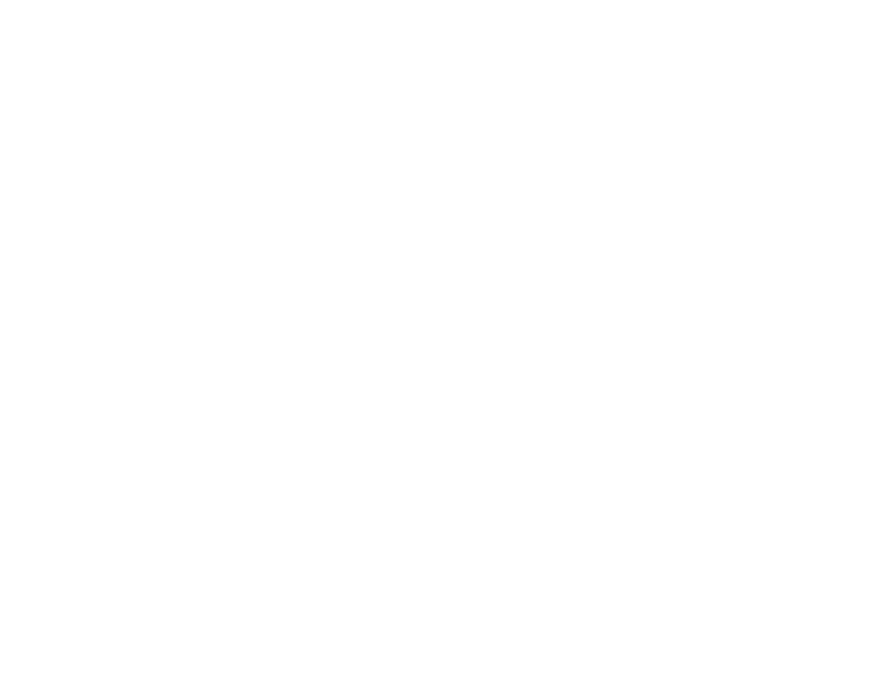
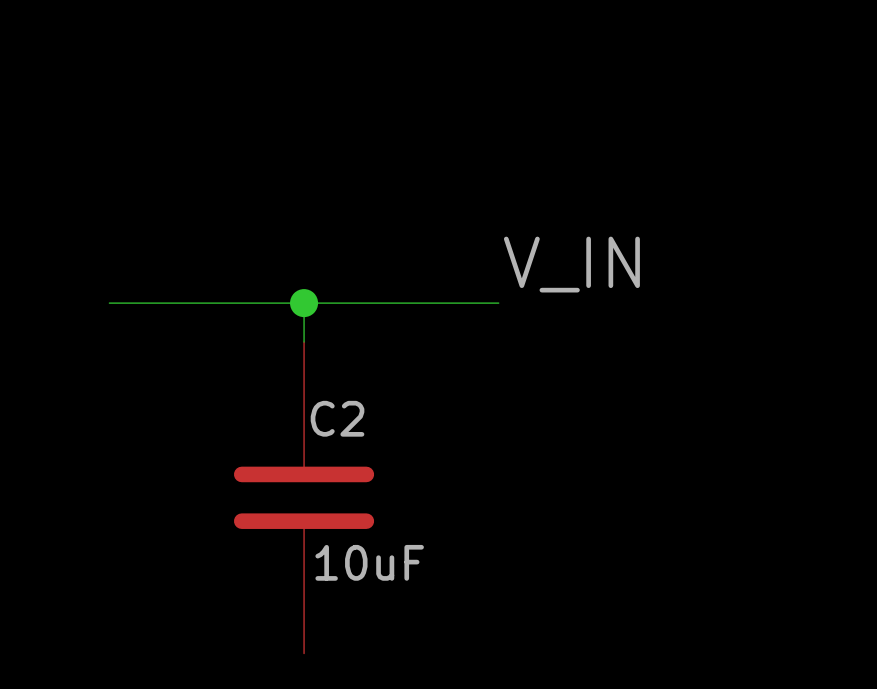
label: none -> V_IN (571, 264)
wire: none -> (109, 303) (498, 303)
wire: none -> (304, 303) (304, 342)
junction: none -> (304, 303)
C2: none -> 10uF (304, 497)

